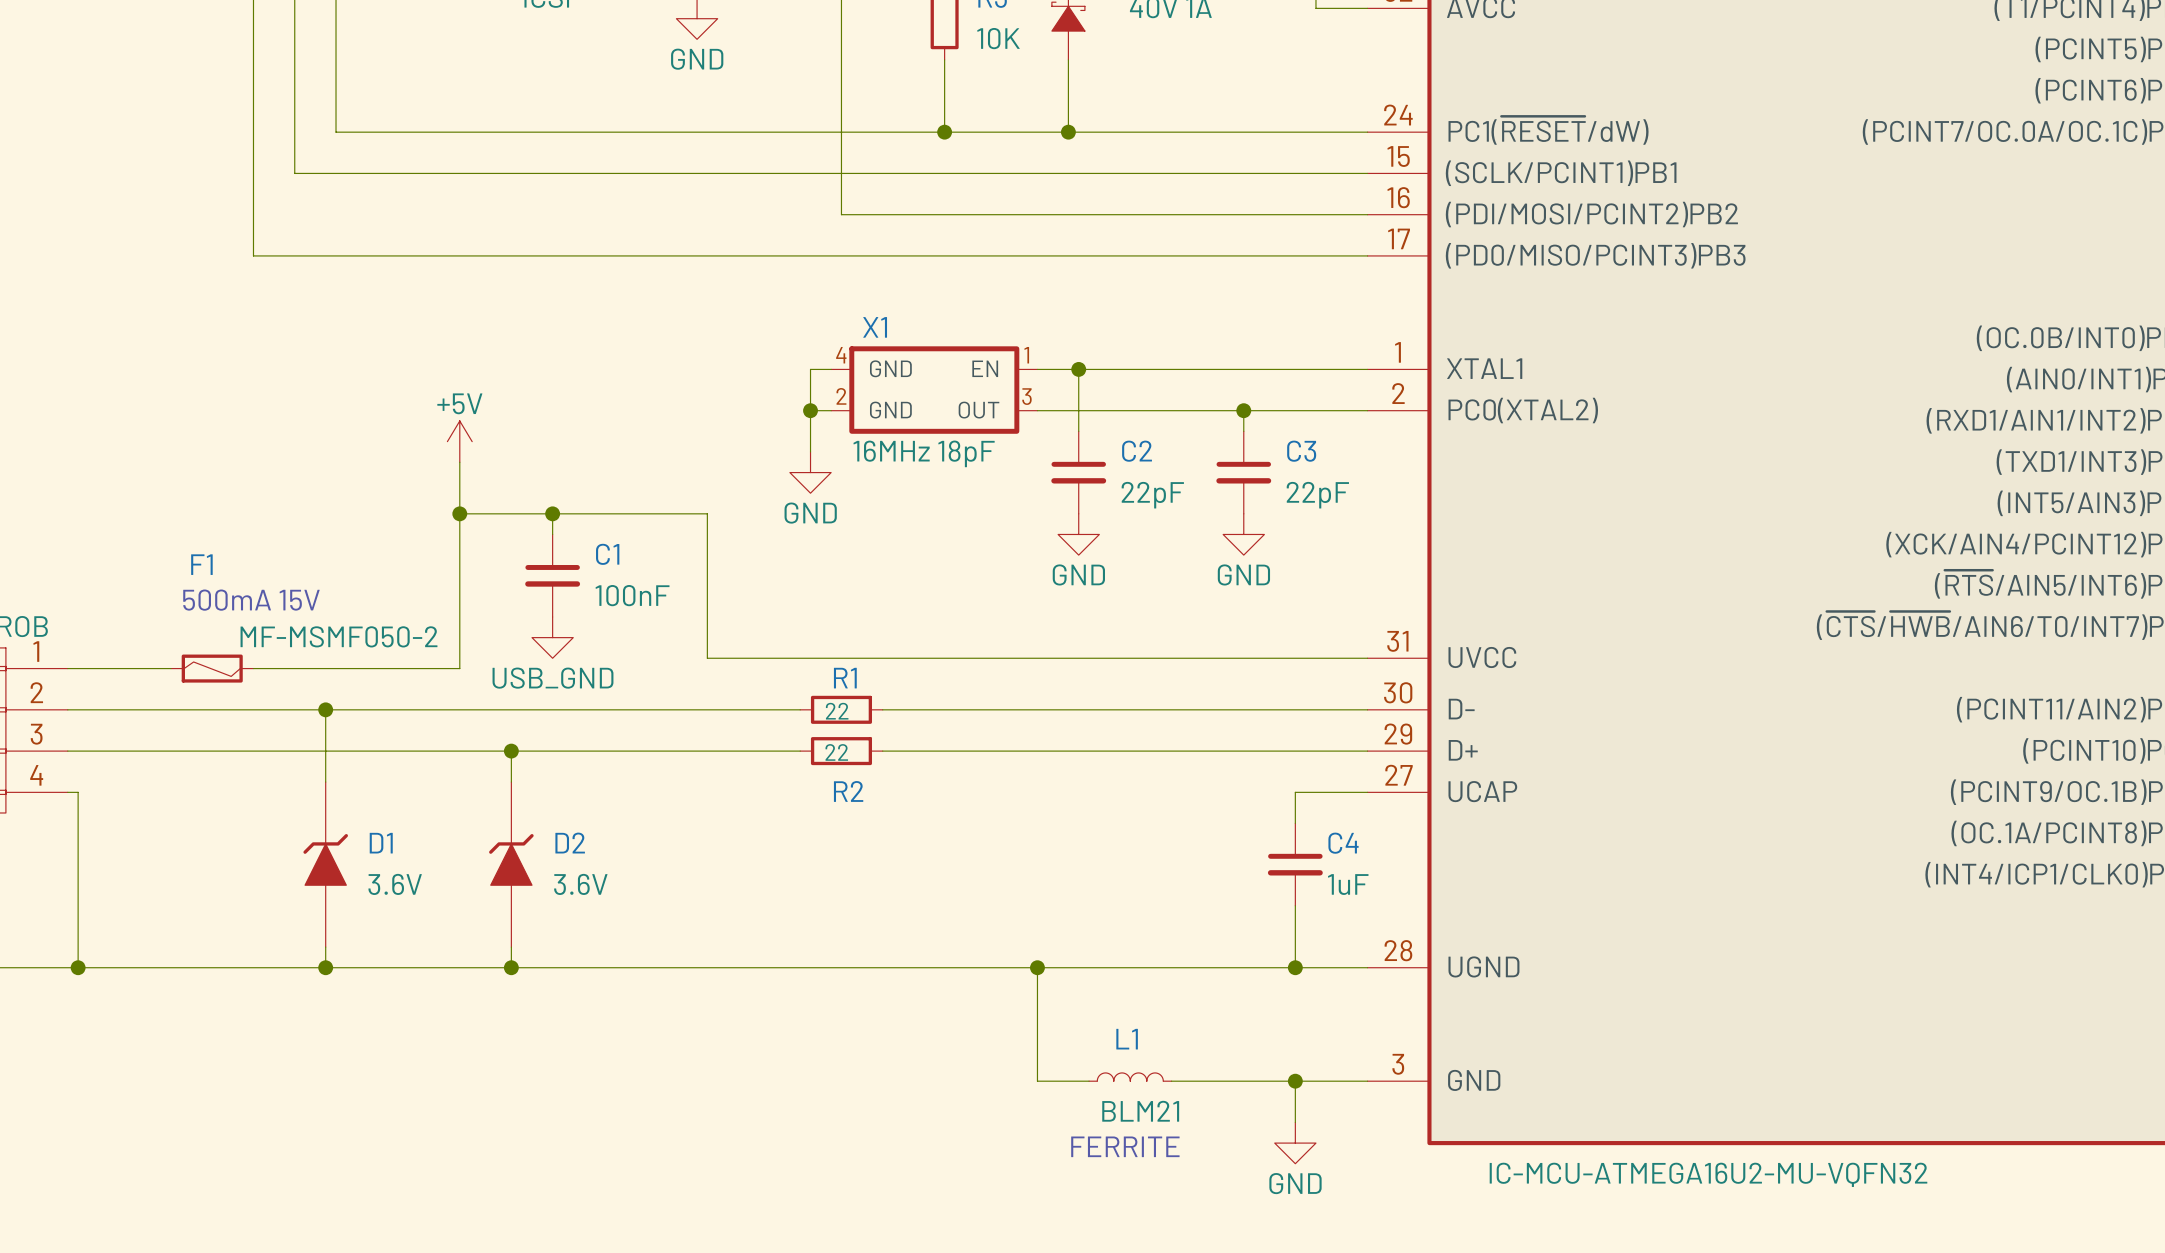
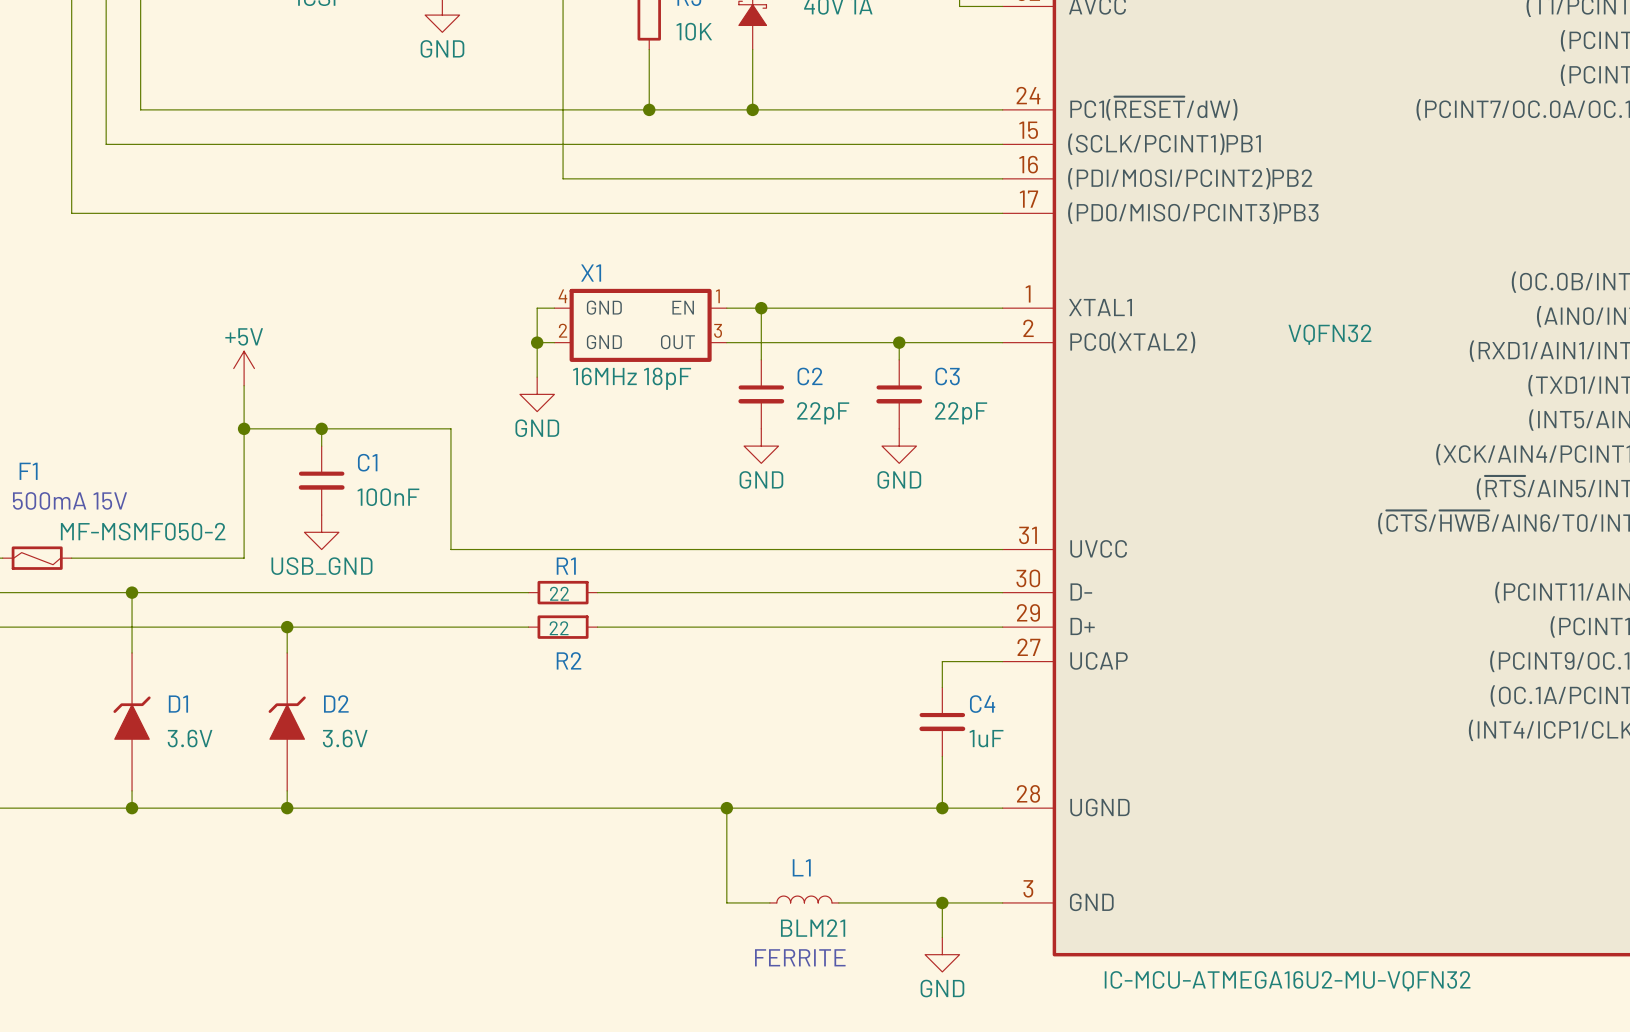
part text: none -> VQFN32 (1329, 334)

